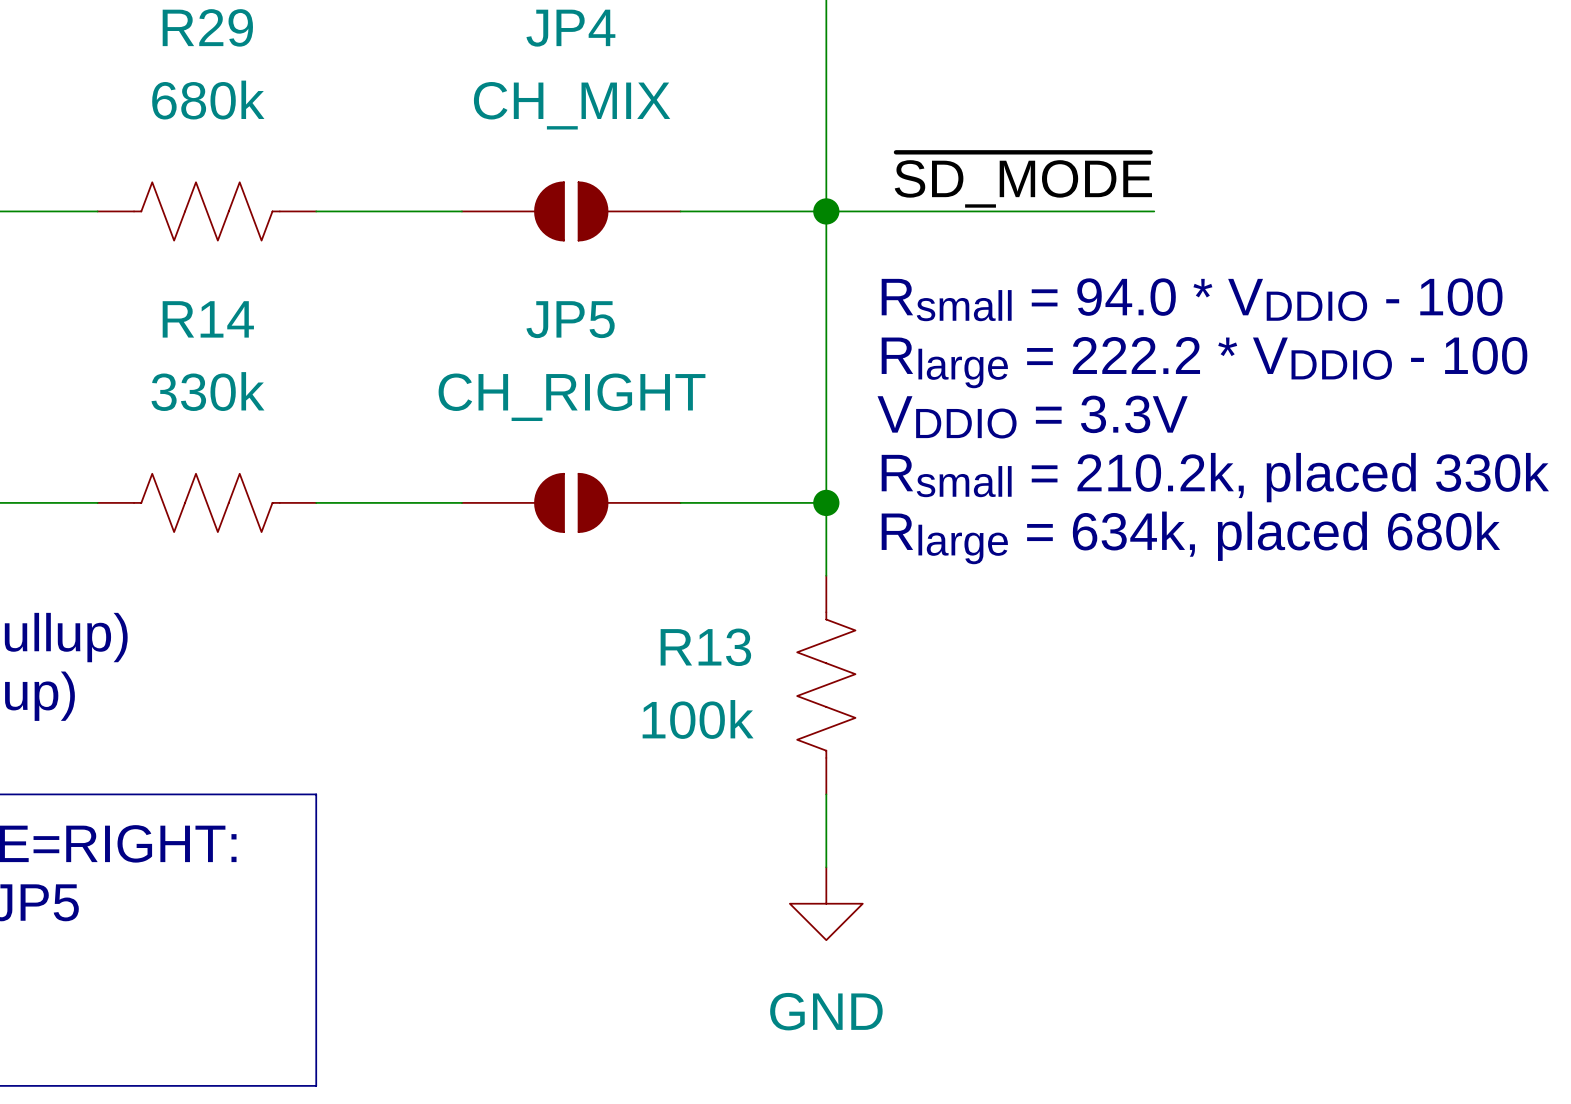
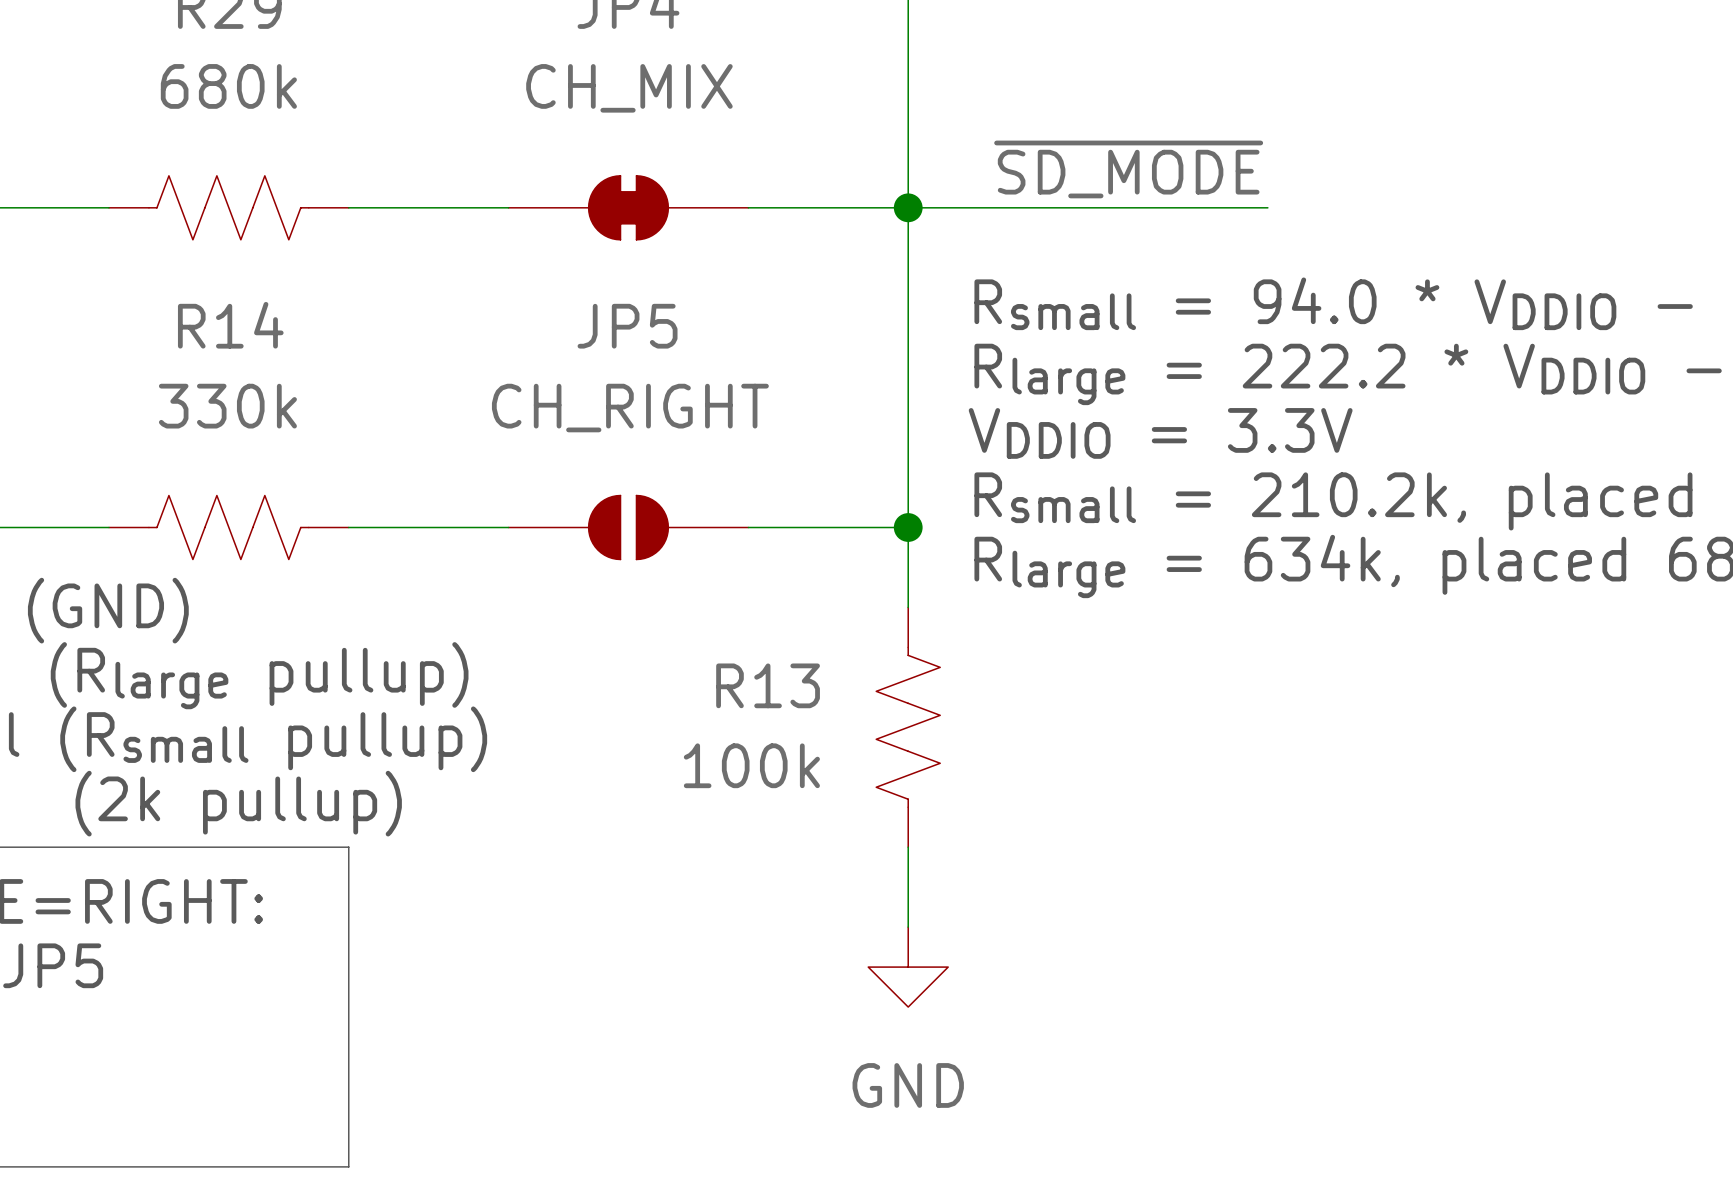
JP4 symbol: [461, 182, 681, 241] -> [508, 175, 749, 240]

